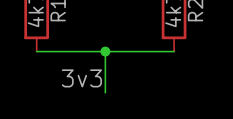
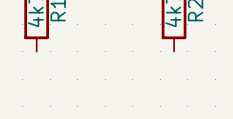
wire: (36, 51) (174, 51) -> none
wire: (105, 51) (105, 92) -> none
junction: (105, 51) -> none
label: 3v3 (81, 78) -> none

